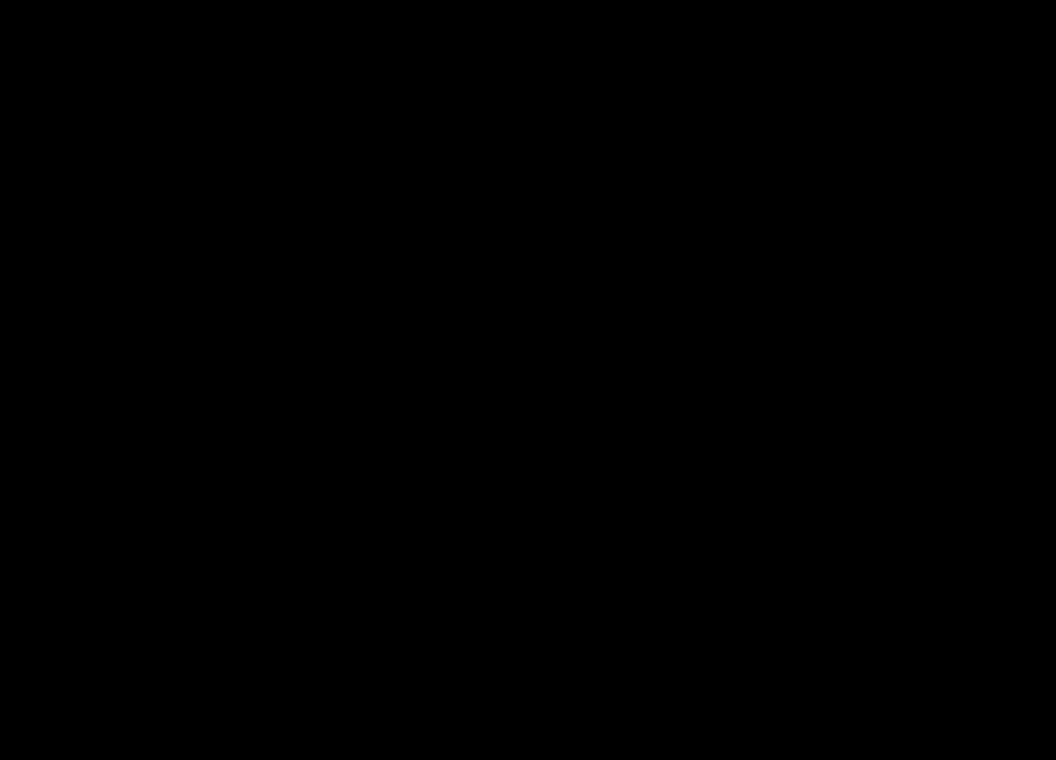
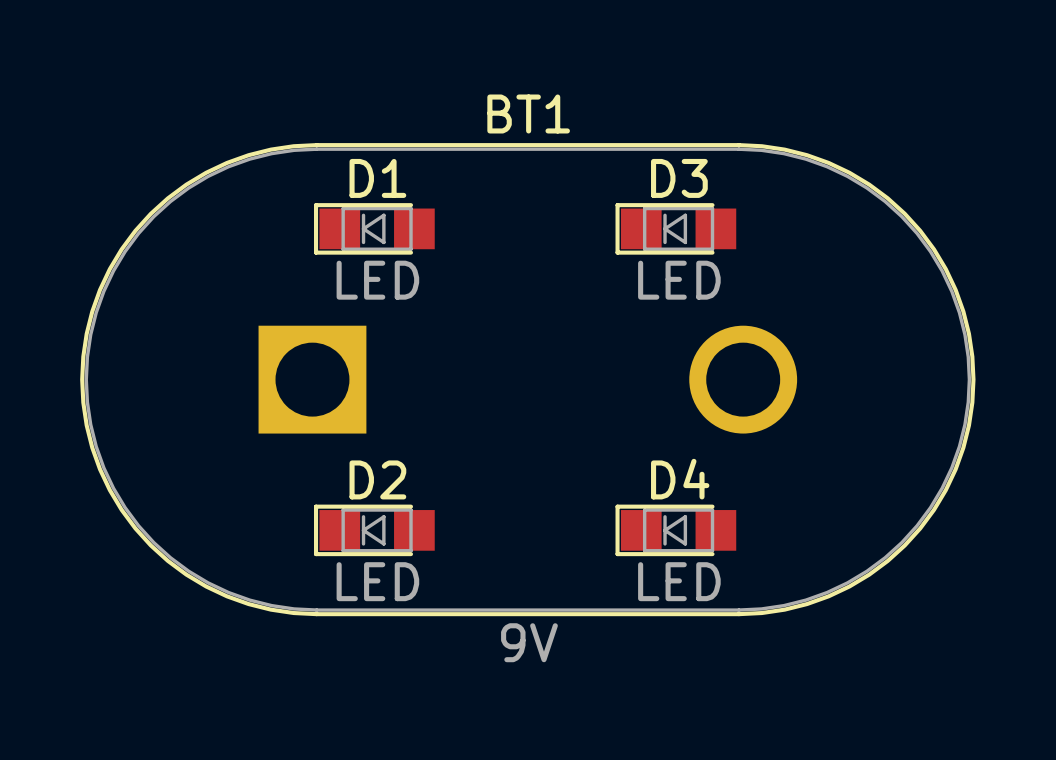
D1: none -> LED (374, 228)
D3: none -> LED (675, 228)
BT1: none -> 9V (527, 379)
D2: none -> LED (374, 530)
D4: none -> LED (675, 530)

